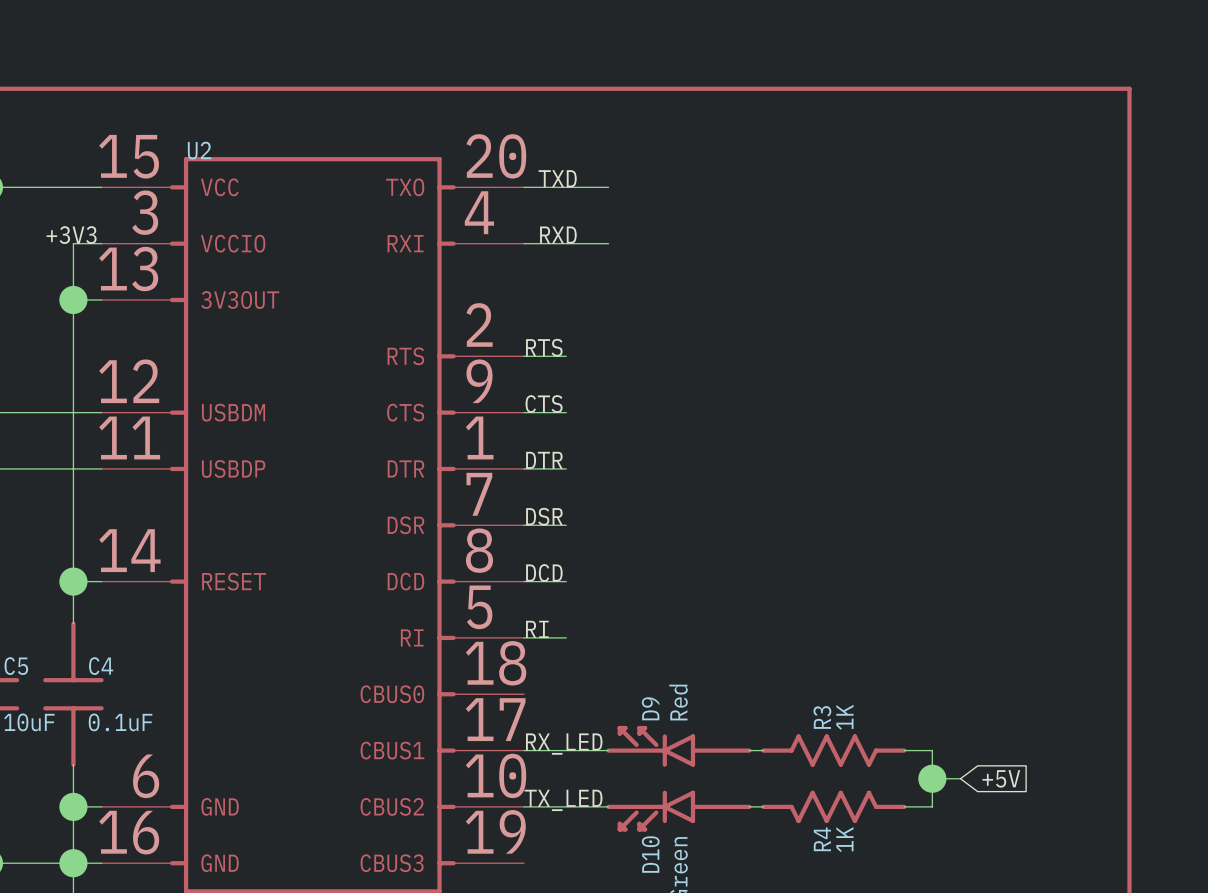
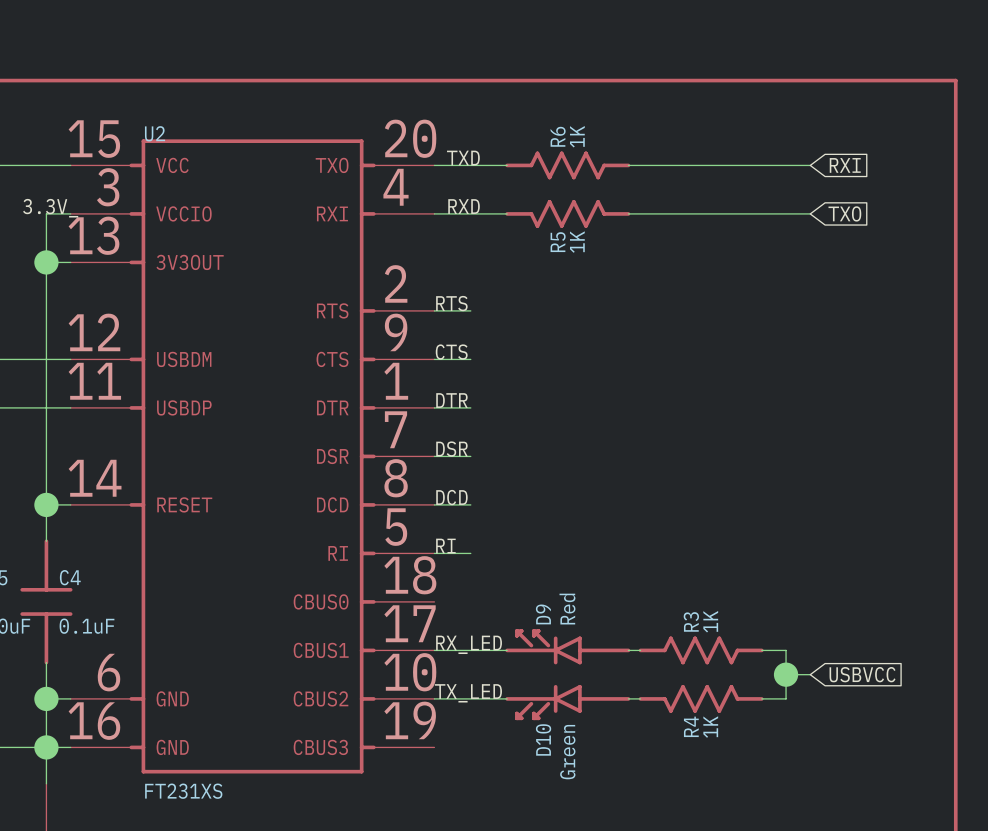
R6: none -> 1K (567, 165)
wire: none -> (628, 165) (810, 165)
global label: none -> RXI (845, 165)
label: +3V3 (71, 235) -> 3.3V_ (50, 208)
R5: none -> 1K (567, 213)
wire: none -> (628, 213) (810, 213)
global label: none -> TXO (844, 213)
global label: +5V (1001, 778) -> USBVCC (862, 674)

